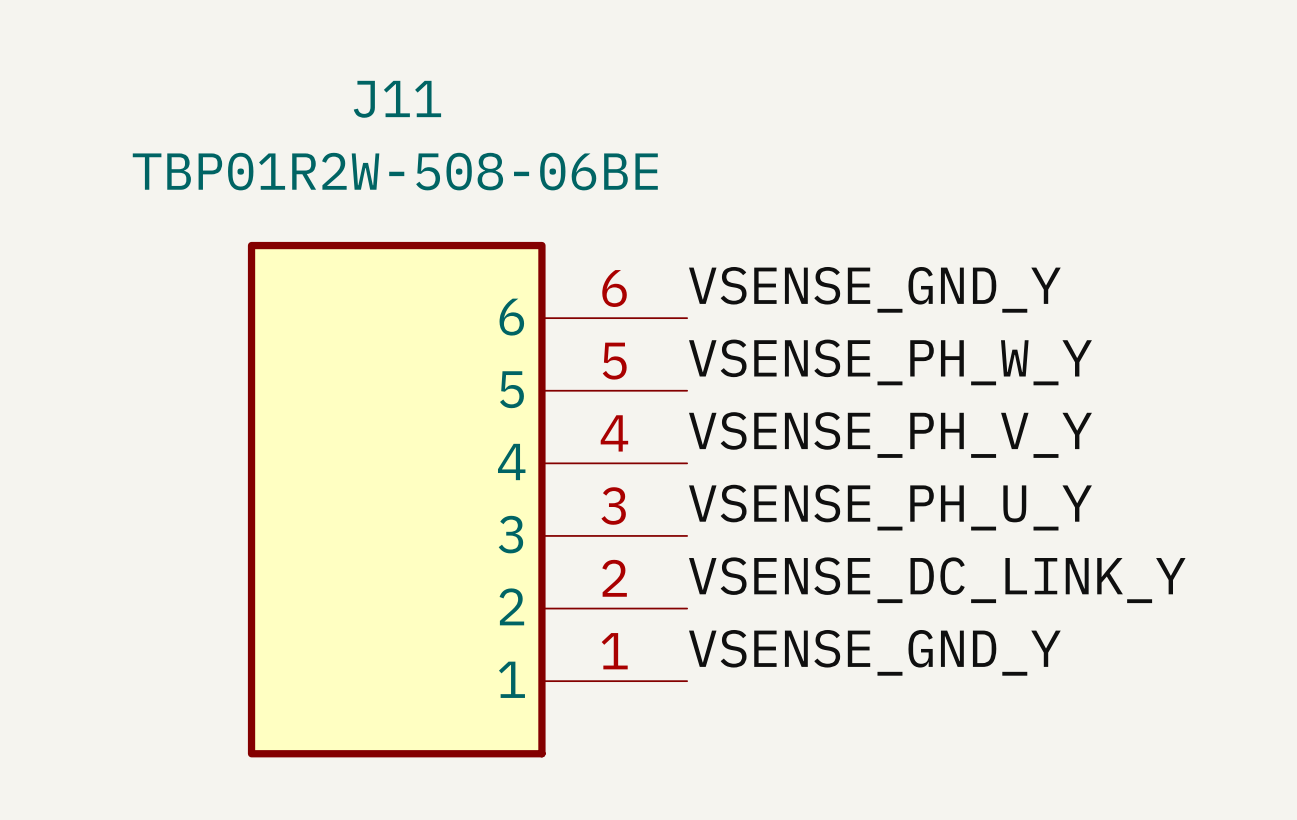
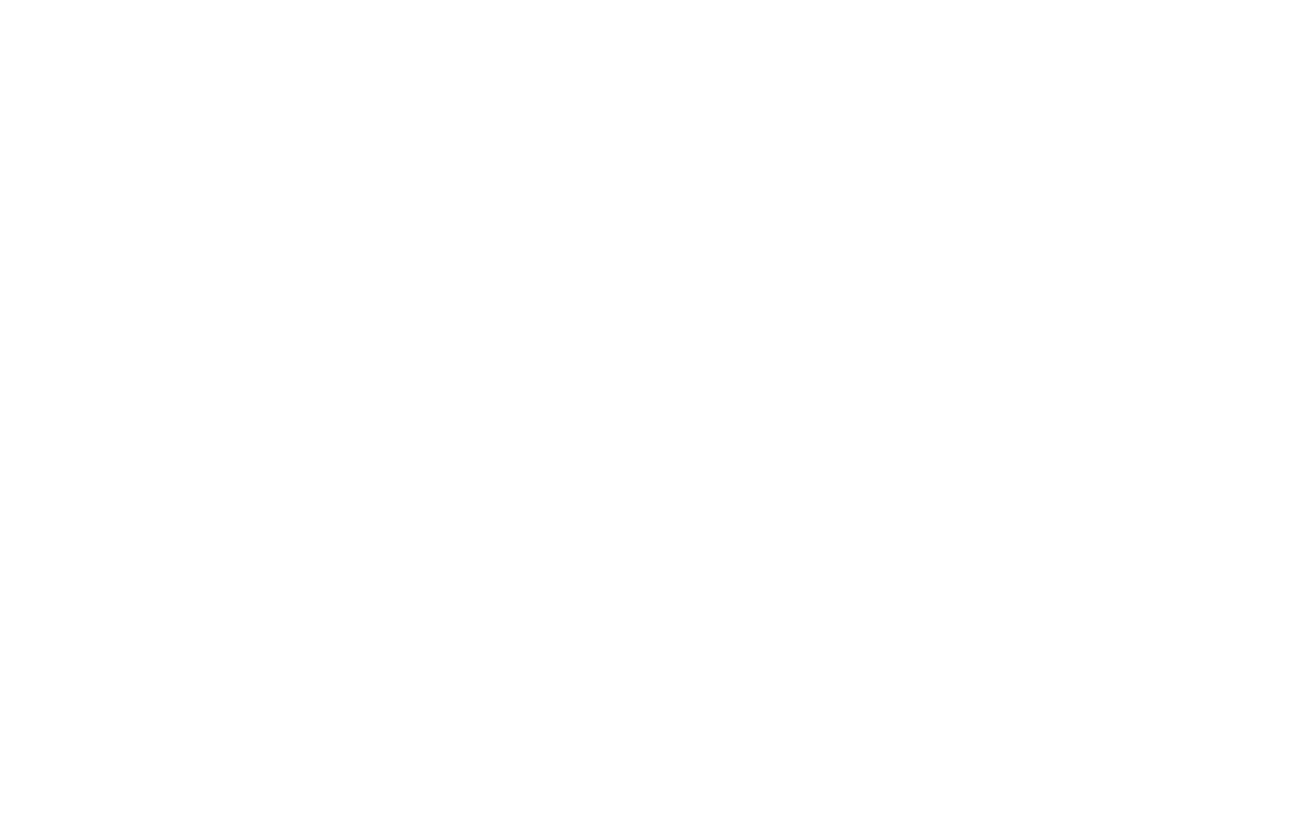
label: VSENSE_GND_Y (874, 289) -> none
label: VSENSE_PH_W_Y (890, 362) -> none
label: VSENSE_PH_V_Y (890, 435) -> none
J11: TBP01R2W-508-06BE (467, 499) -> none
label: VSENSE_PH_U_Y (890, 507) -> none
label: VSENSE_DC_LINK_Y (937, 580) -> none
label: VSENSE_GND_Y (874, 652) -> none

